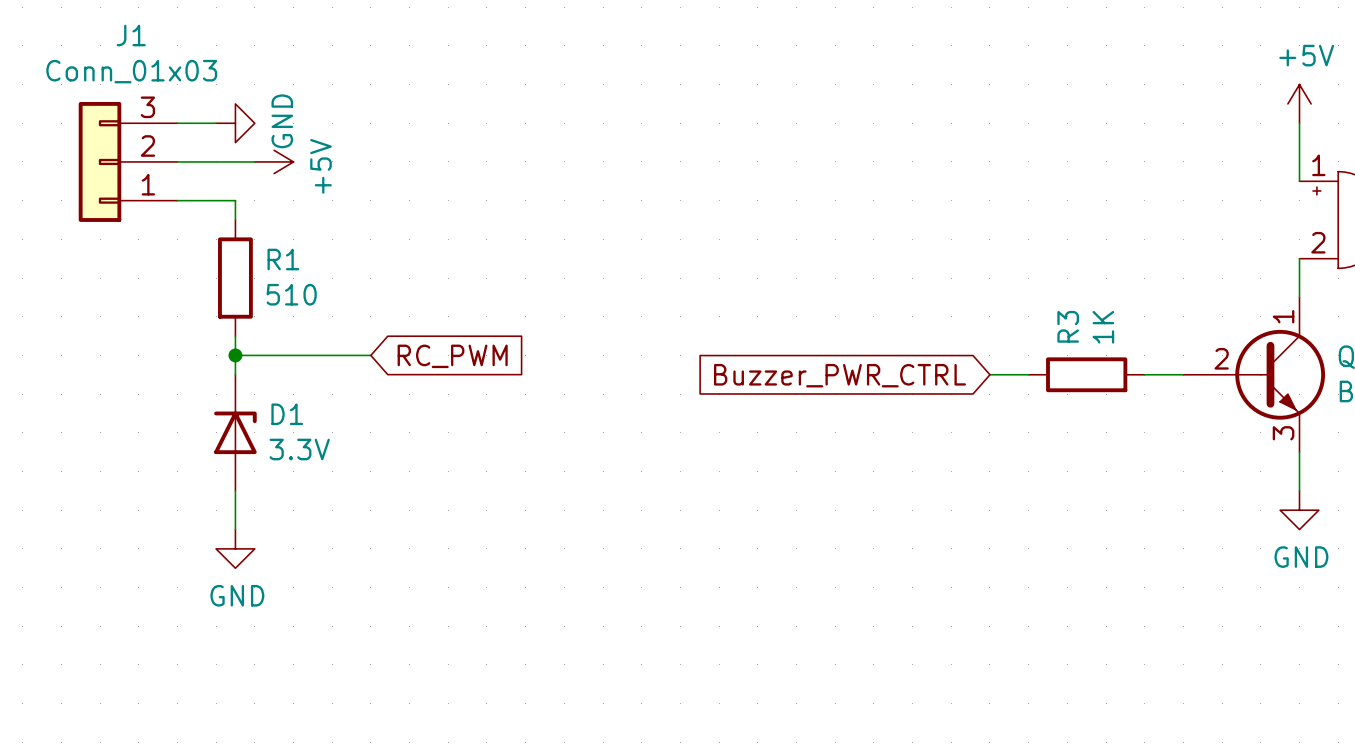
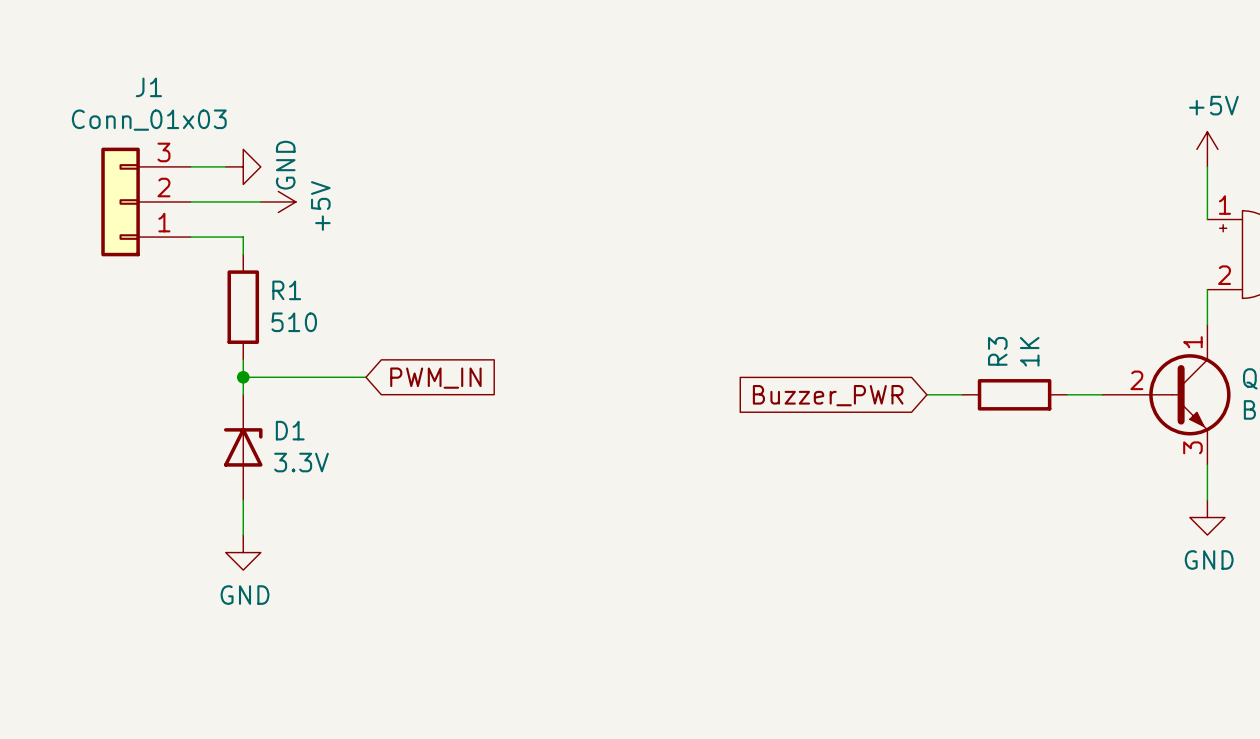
global label: RC_PWM (452, 356) -> PWM_IN (435, 378)
global label: Buzzer_PWR_CTRL (839, 375) -> Buzzer_PWR (828, 395)

